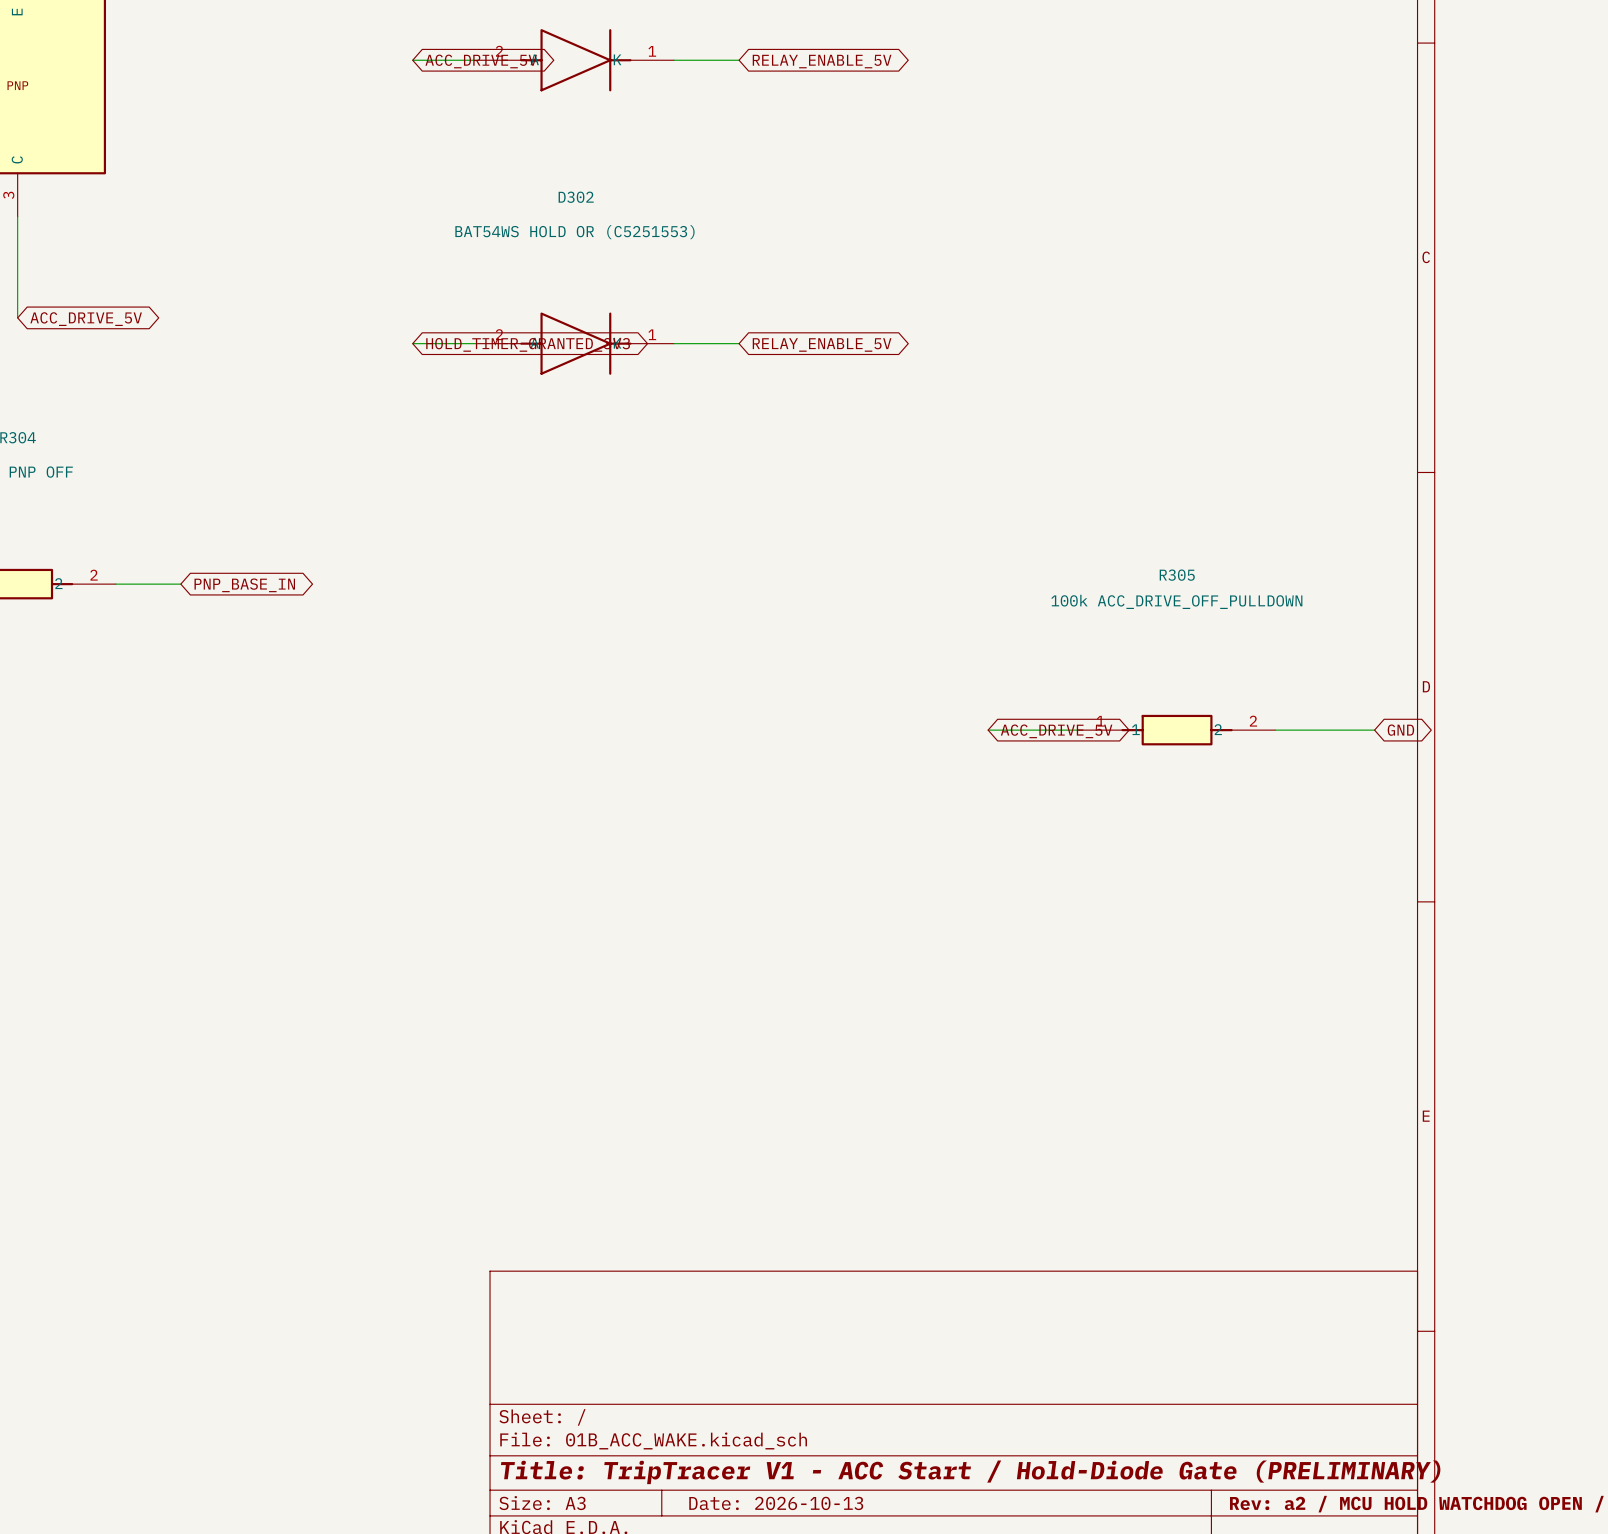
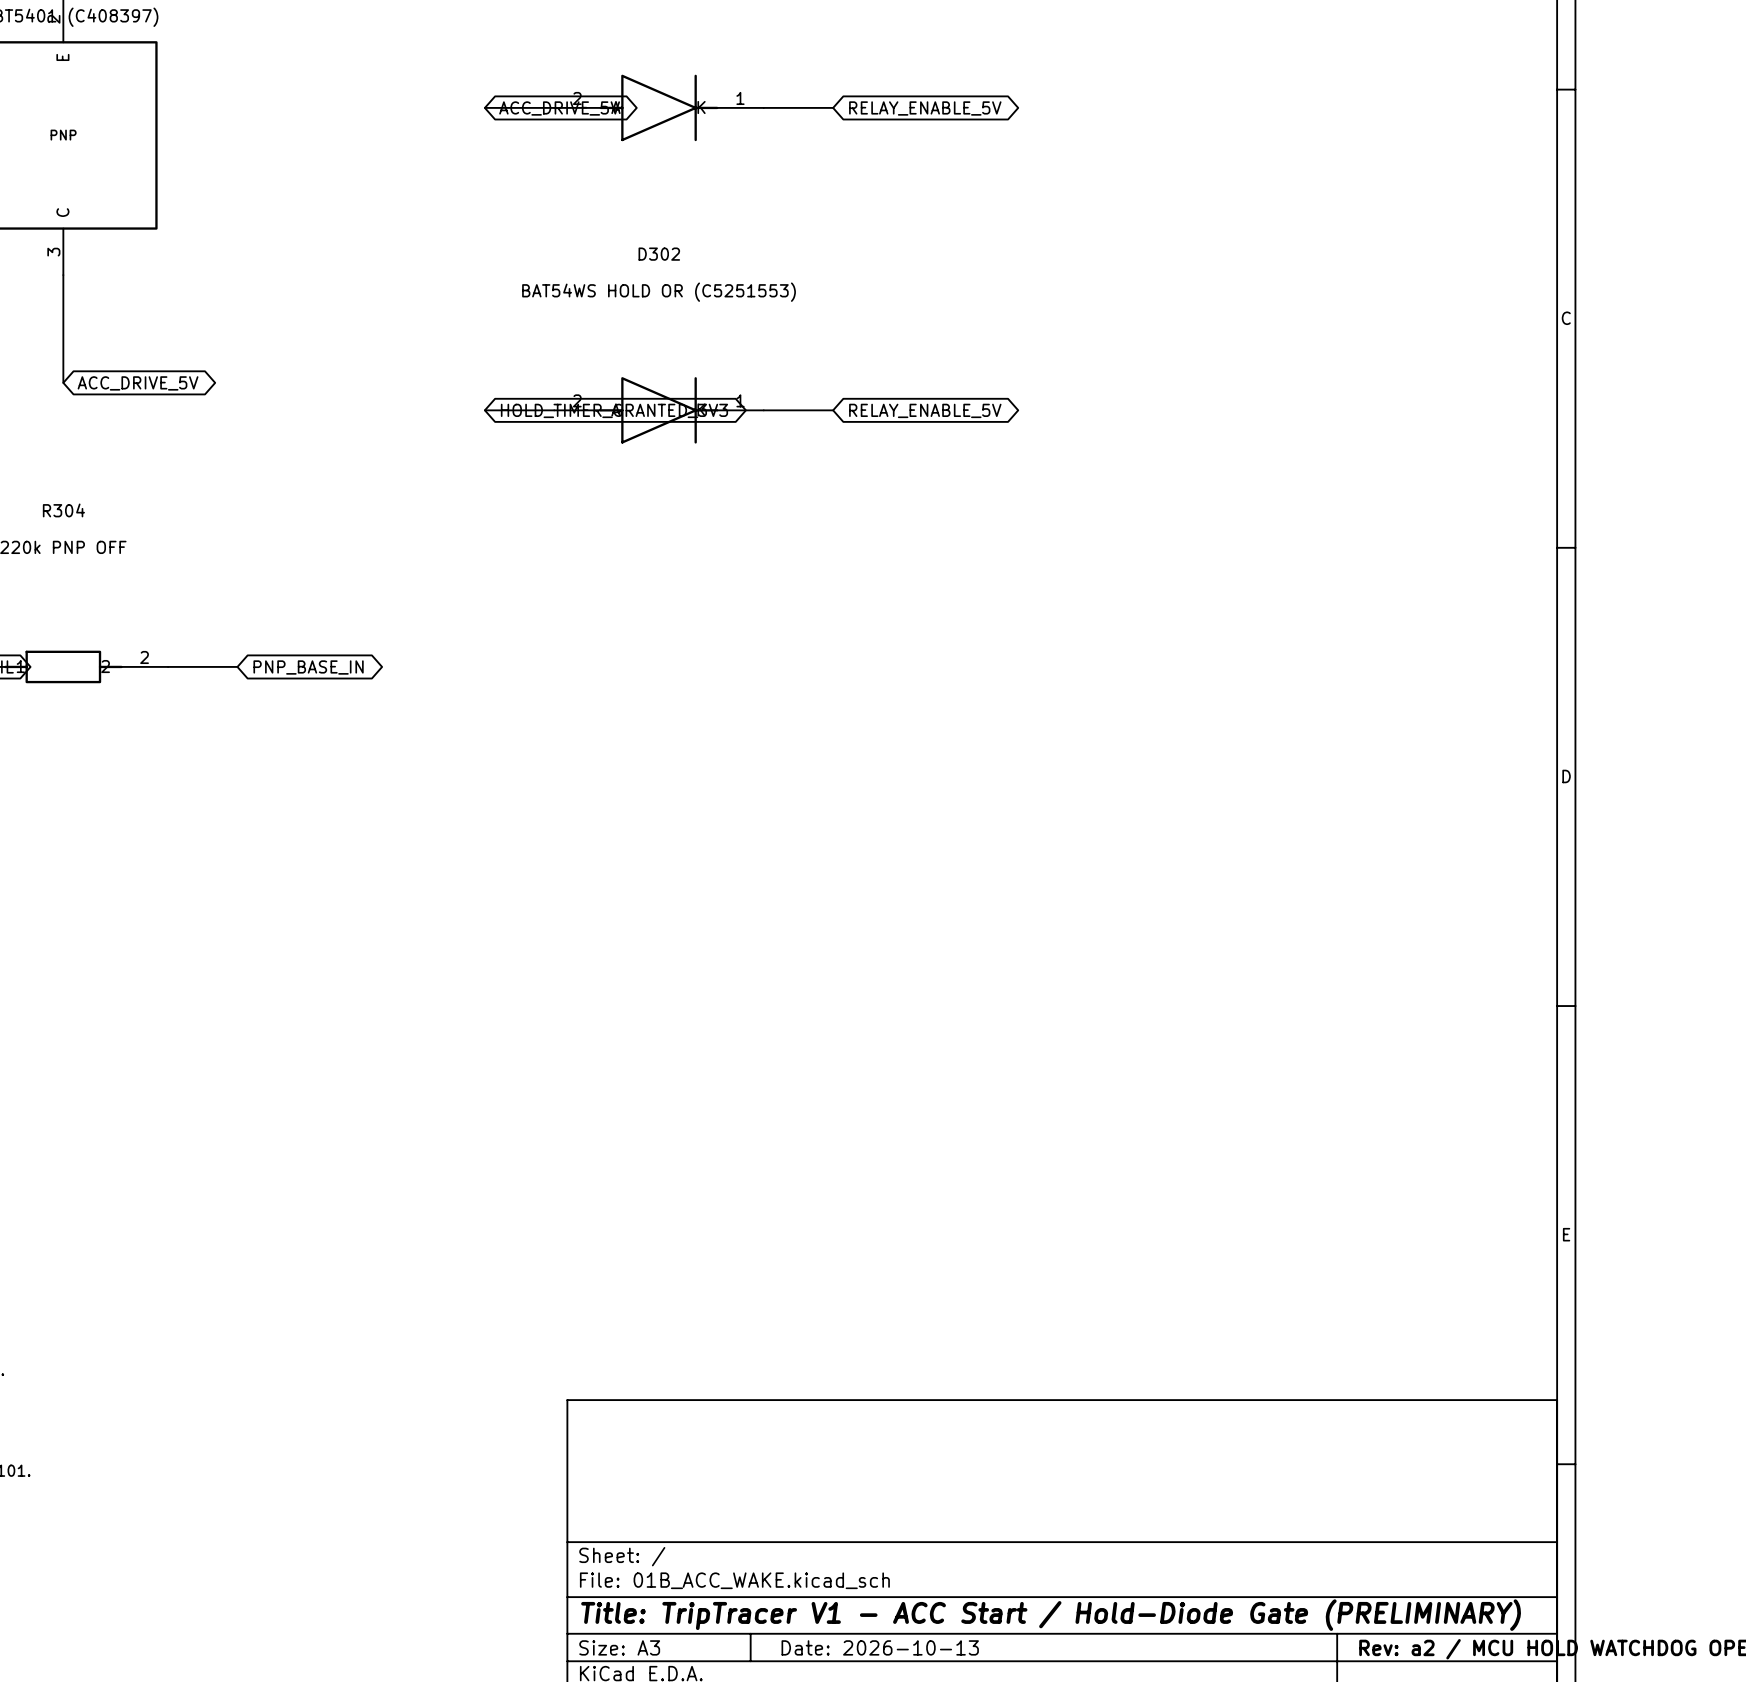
wire: (988, 730) (1078, 730) -> none
R305: 100k ACC_DRIVE_OFF_PULLDOWN (1177, 730) -> none
wire: (1275, 730) (1374, 730) -> none
global label: GND (1400, 730) -> none
global label: ACC_DRIVE_5V (1056, 731) -> none

